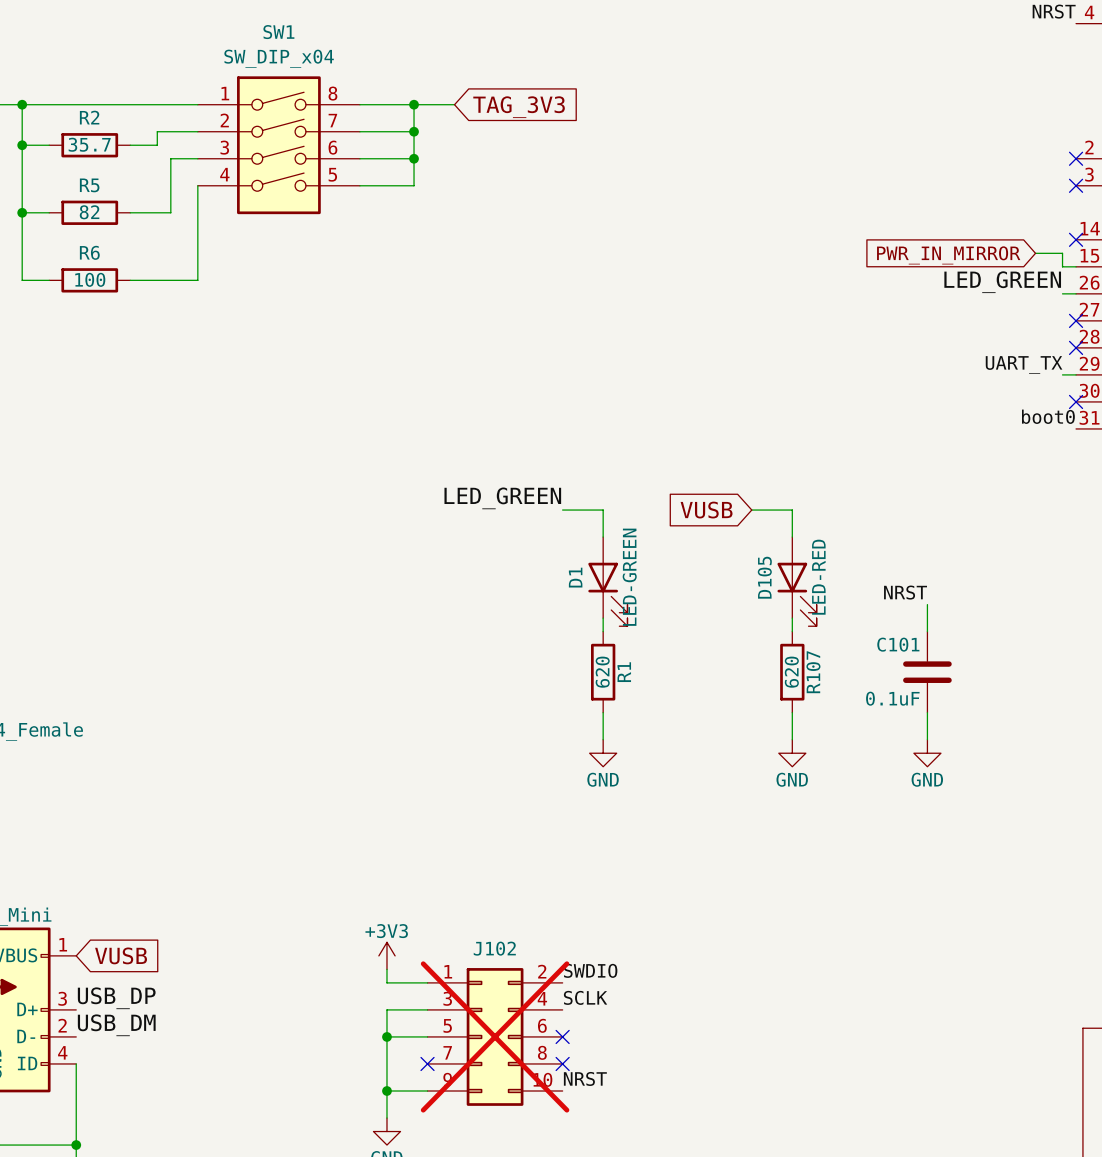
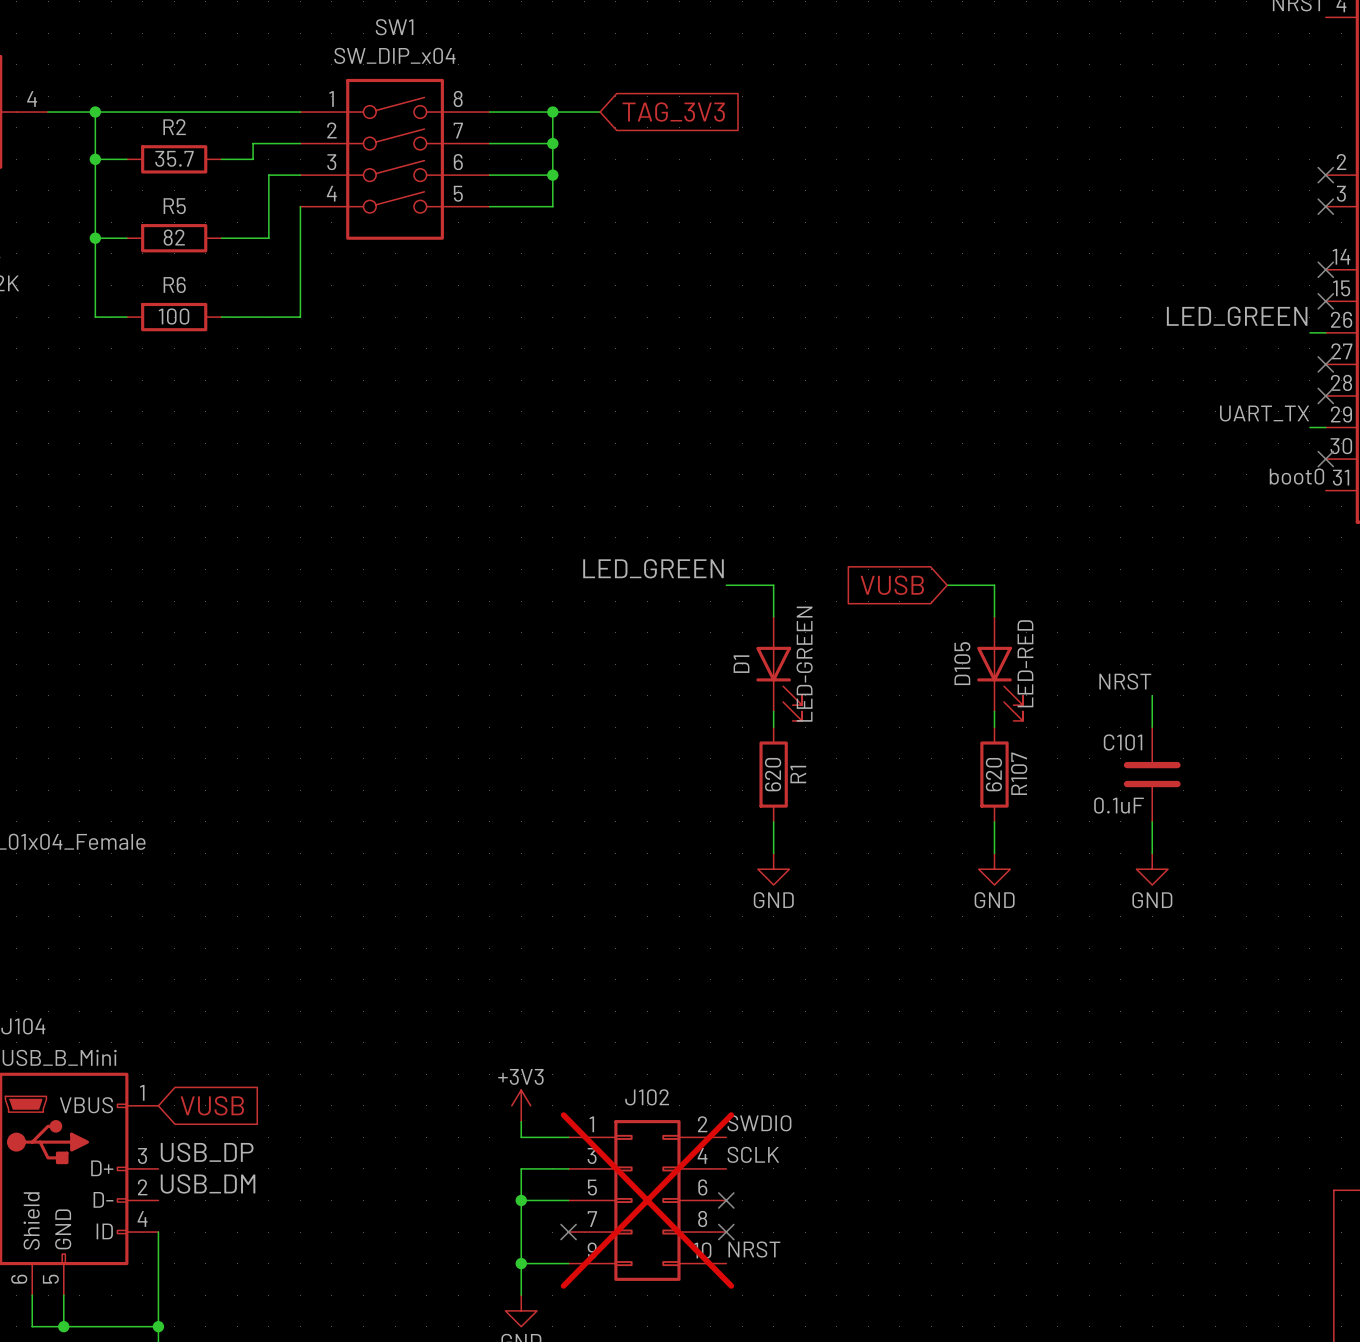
wire: (1035, 253) (1062, 253) (1062, 266) (1076, 266) -> none
global label: PWR_IN_MIRROR (948, 255) -> none
no-connect mark: none -> (1325, 301)

